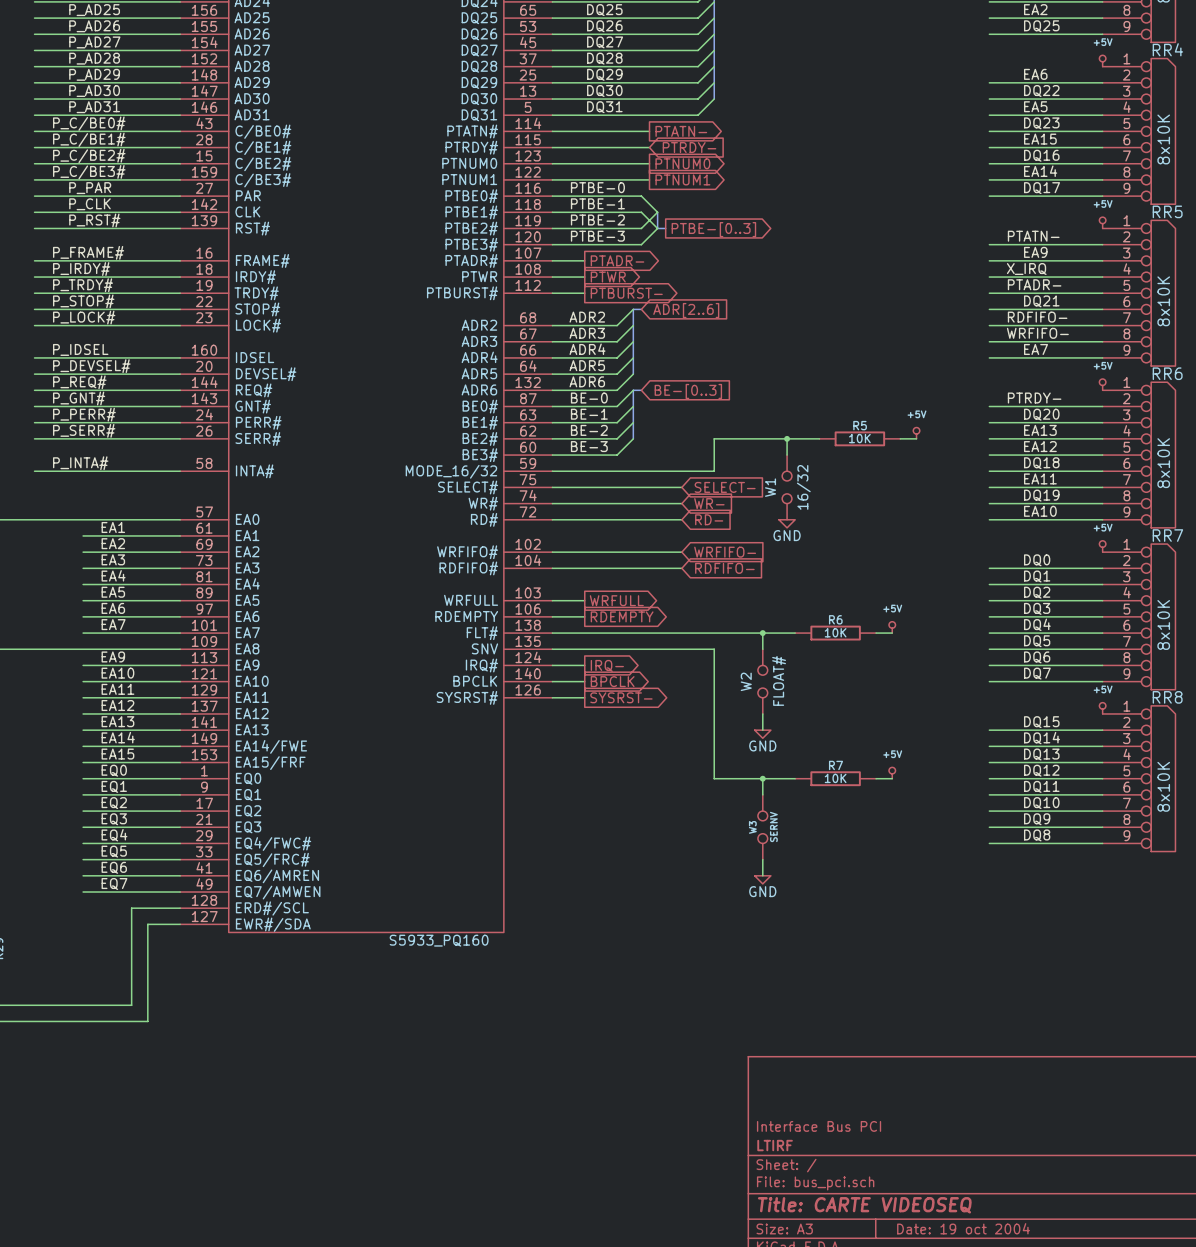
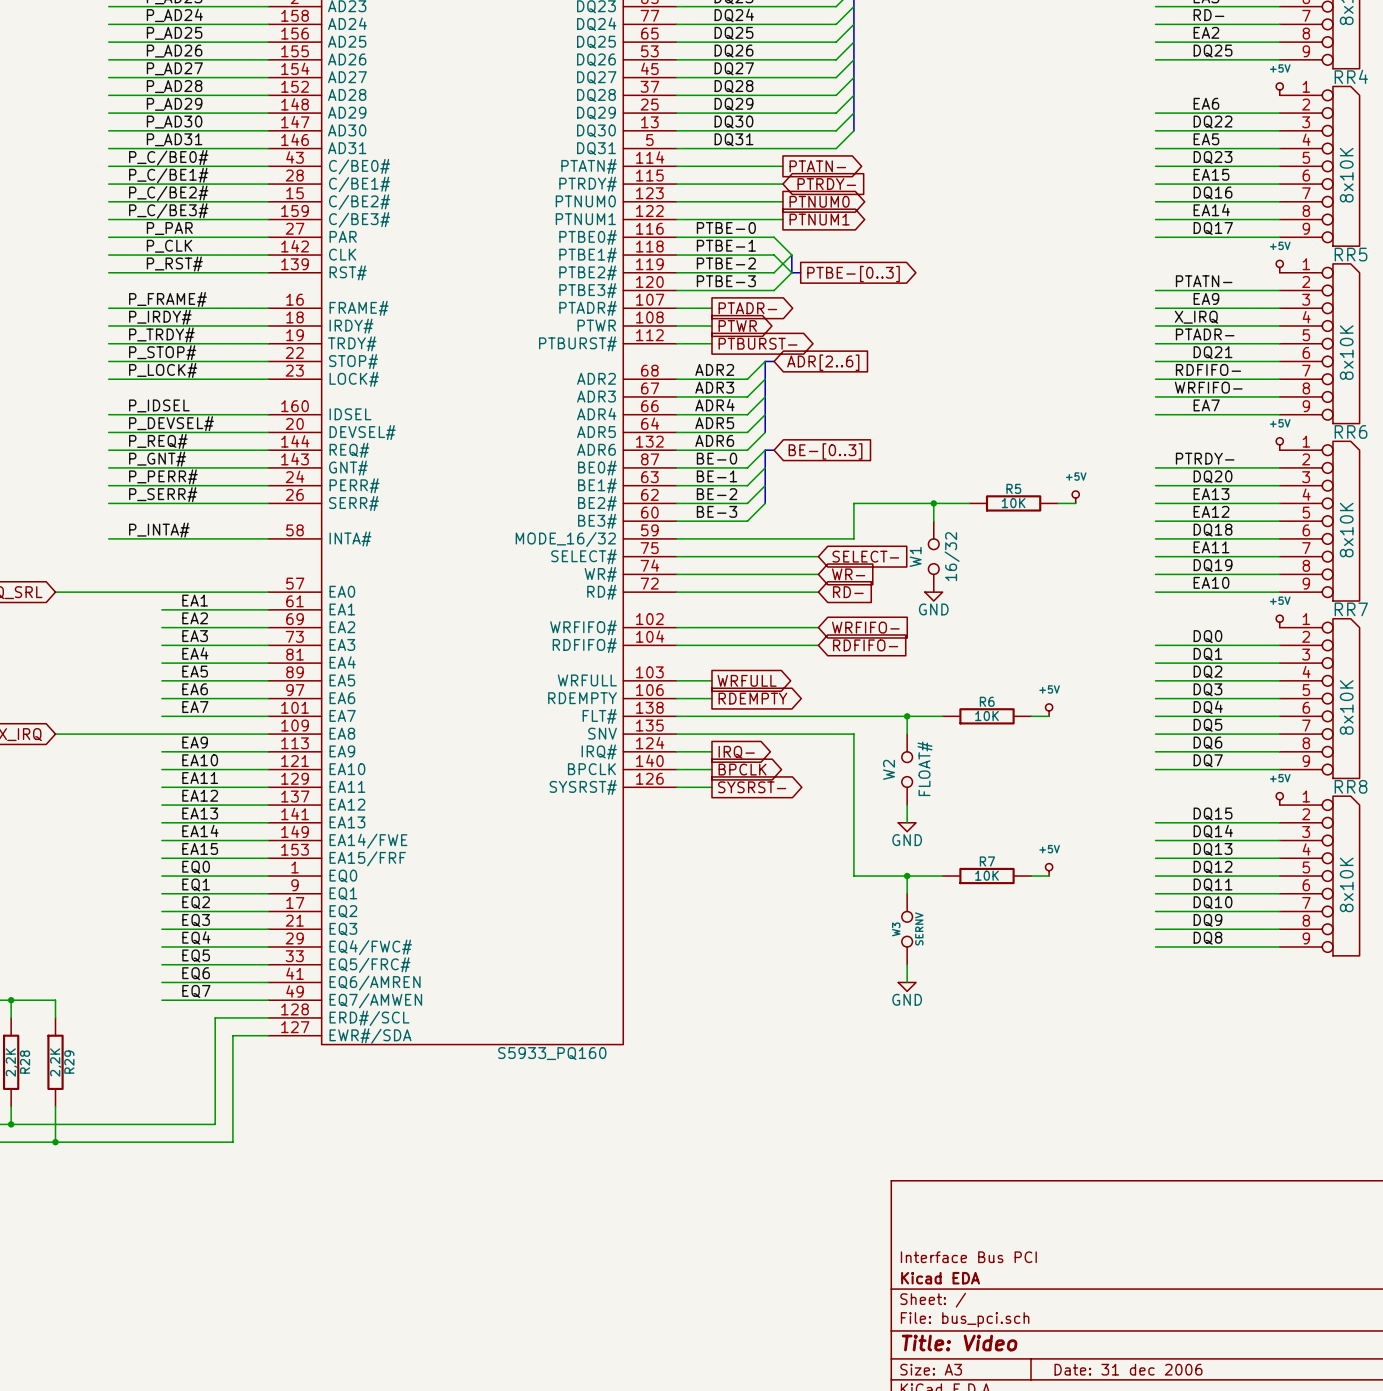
title block: LTIRF (775, 1145) -> Kicad EDA (940, 1278)
title block: Title: CARTE VIDEOSEQ (864, 1205) -> Title: Video (959, 1343)
title block: Date: 19 oct 2004 (963, 1228) -> Date: 31 dec 2006 (1128, 1369)

